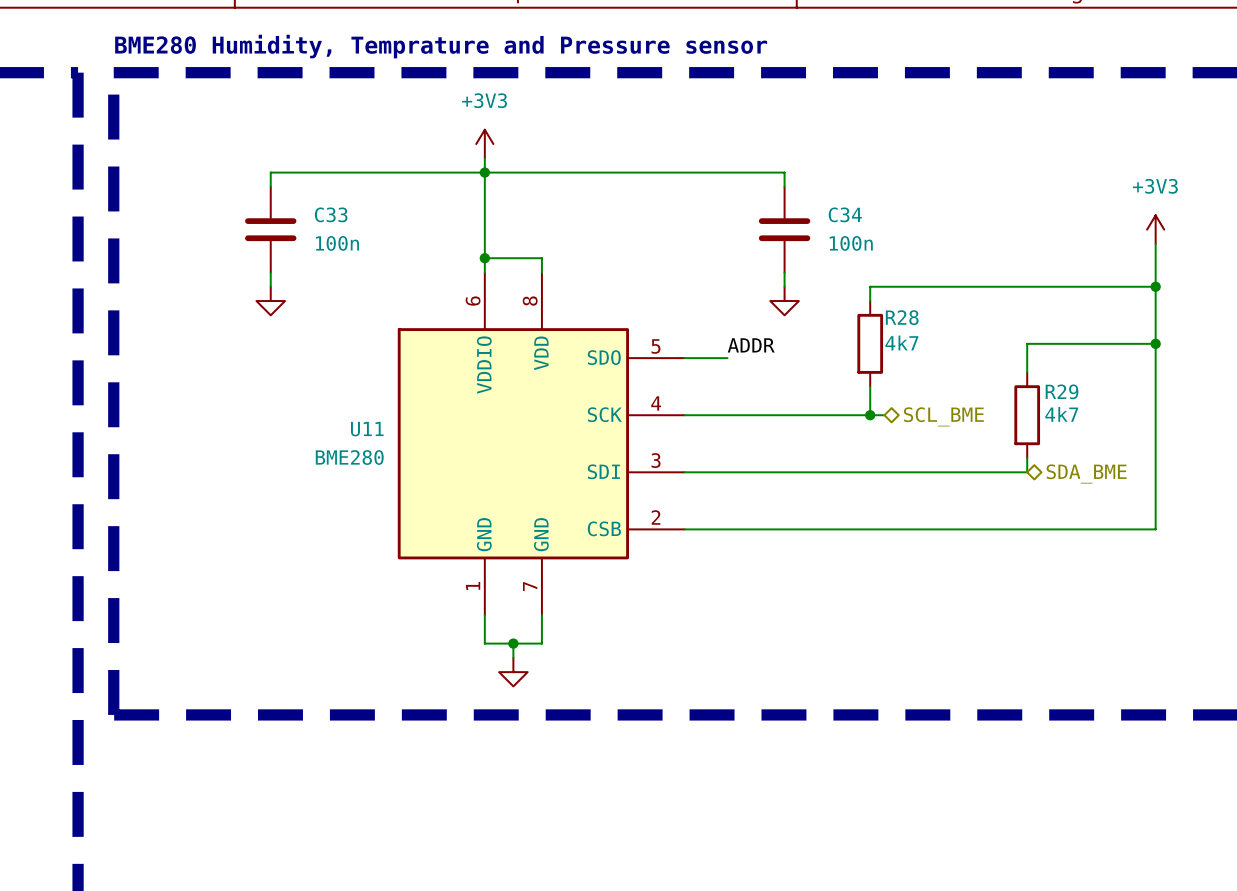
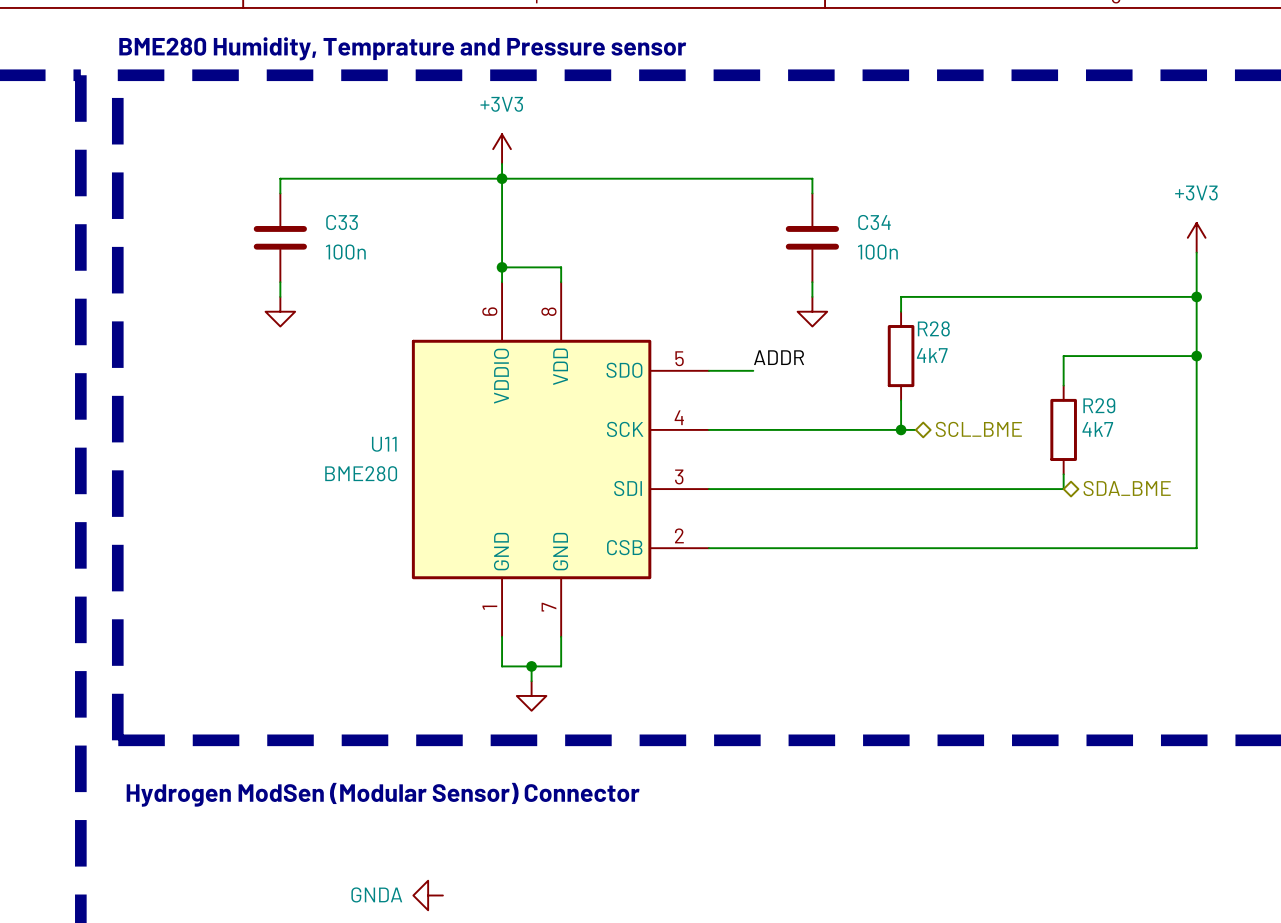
text: none -> Hydrogen ModSen (Modular Sensor) Connector (383, 794)
power symbol: none -> GNDA (428, 895)

